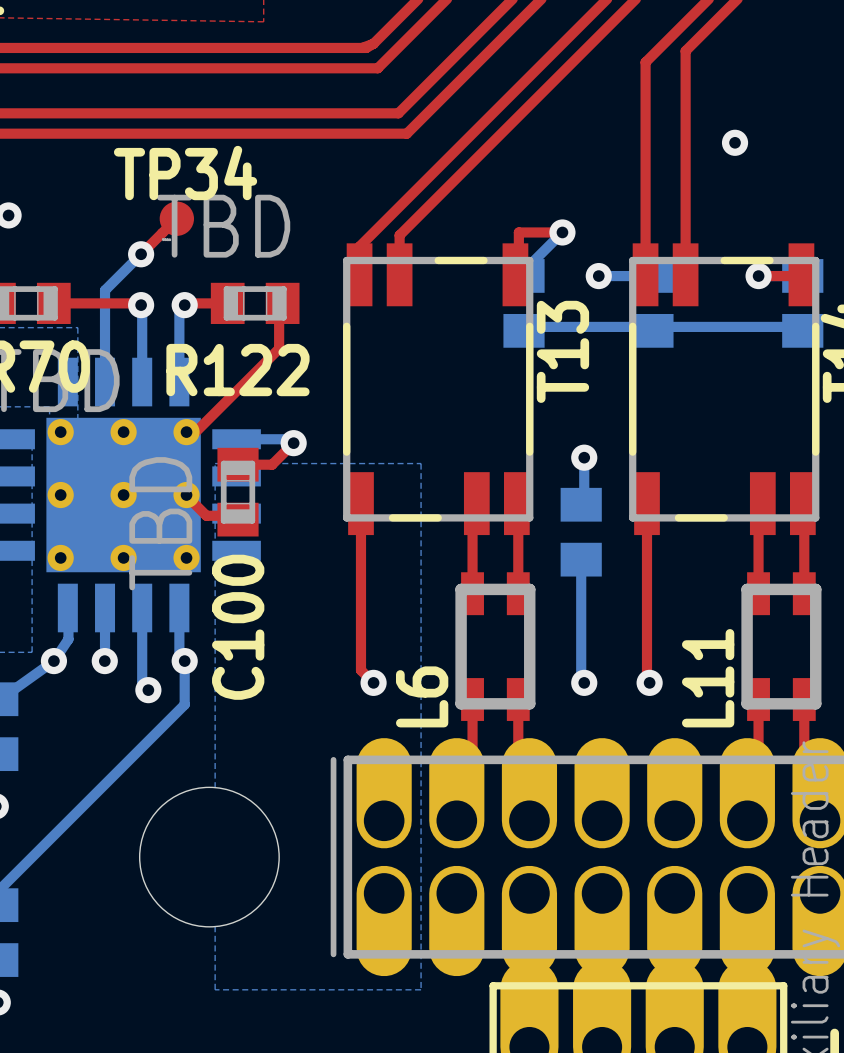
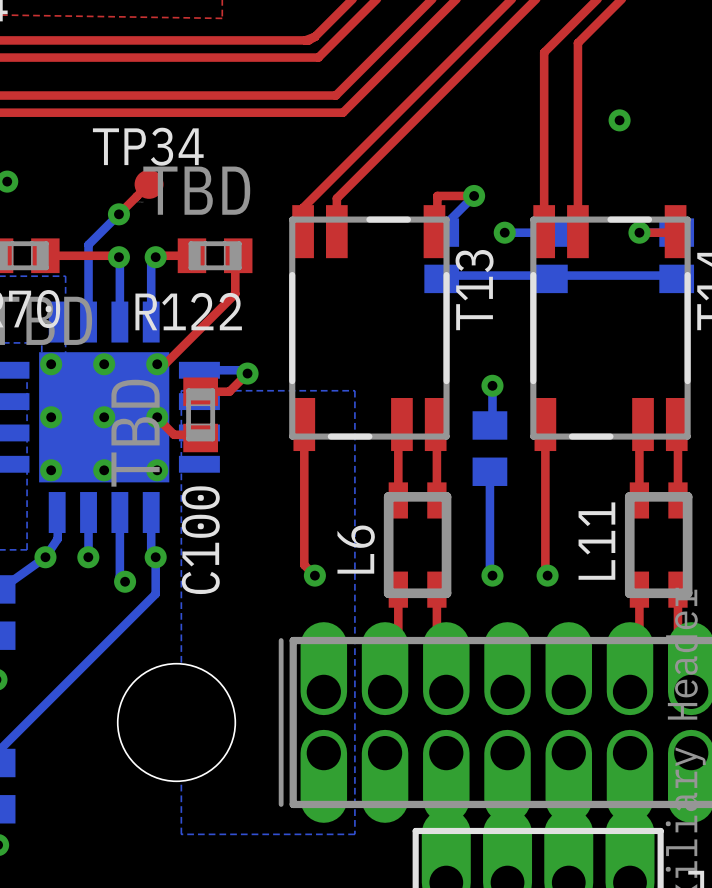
L11 name position: L11 (708, 678) -> L11 (596, 541)
L6 name position: L6 (422, 696) -> L6 (356, 549)

